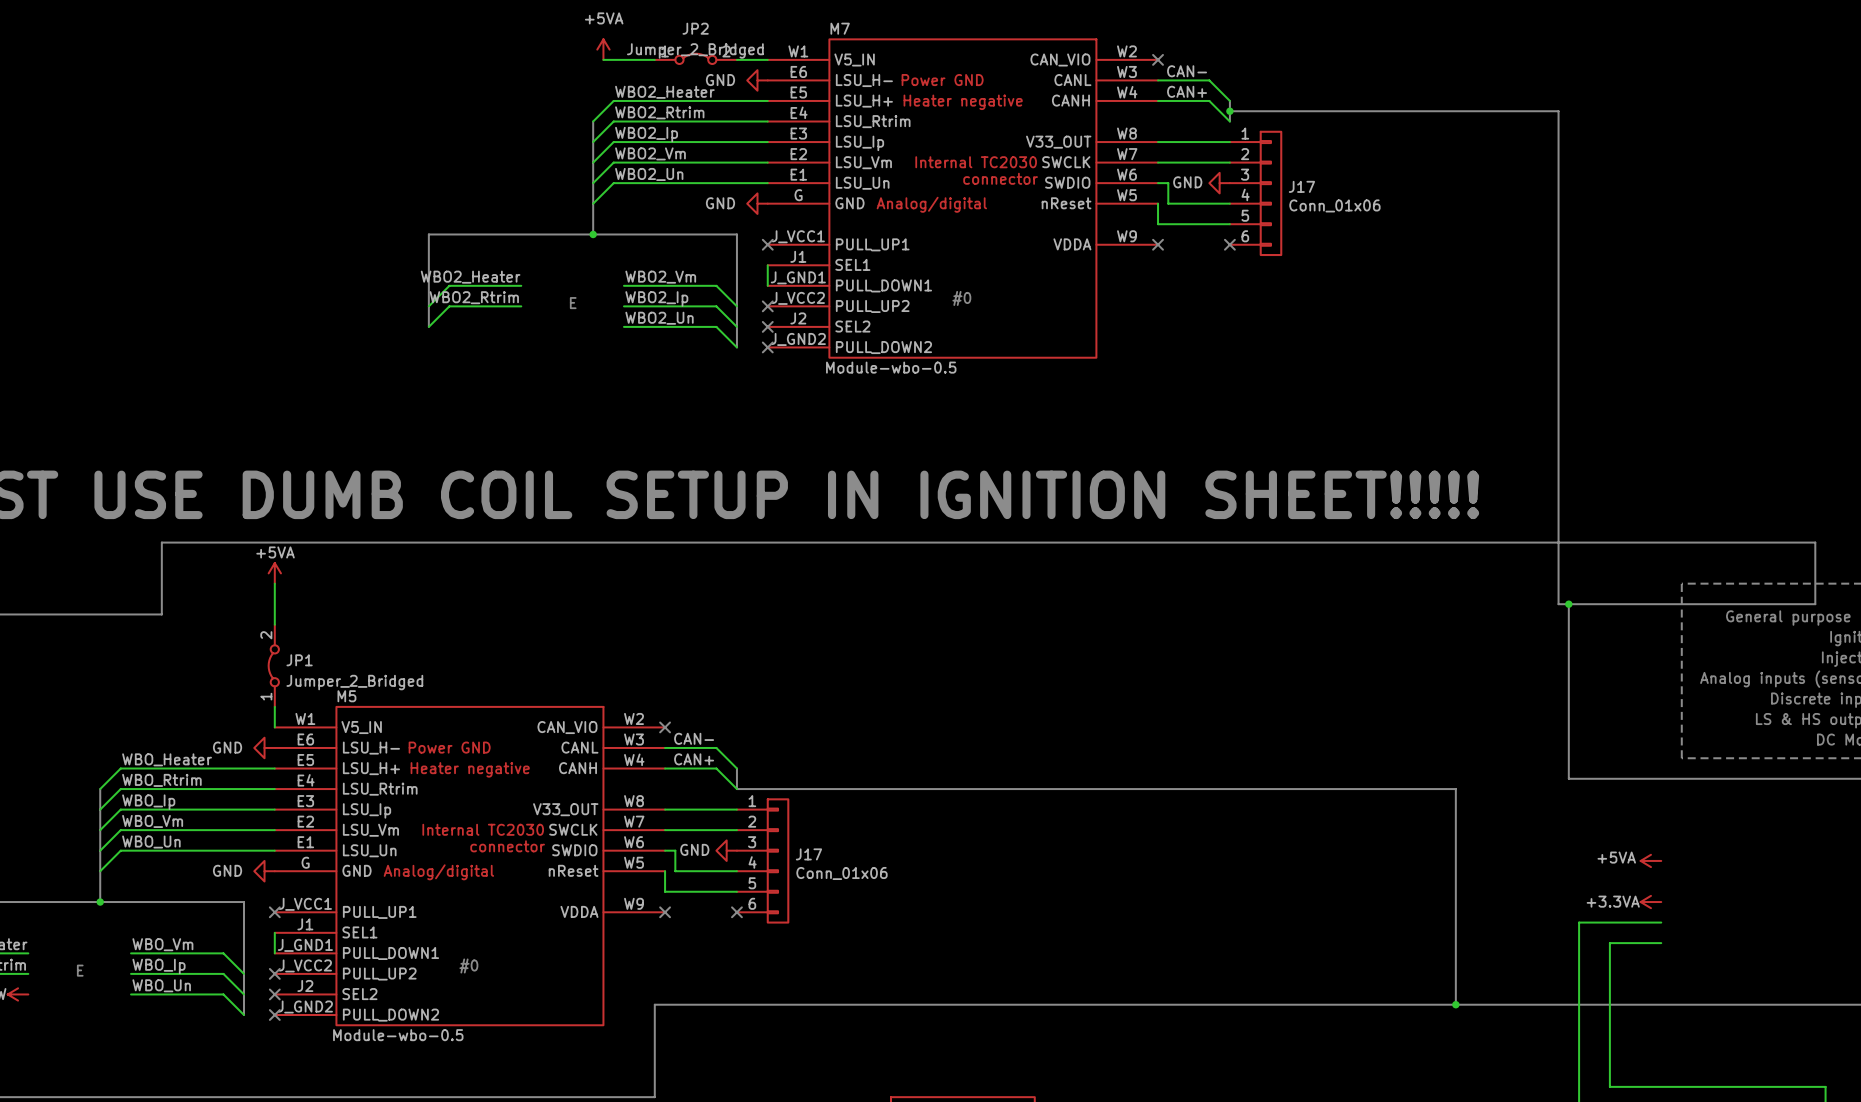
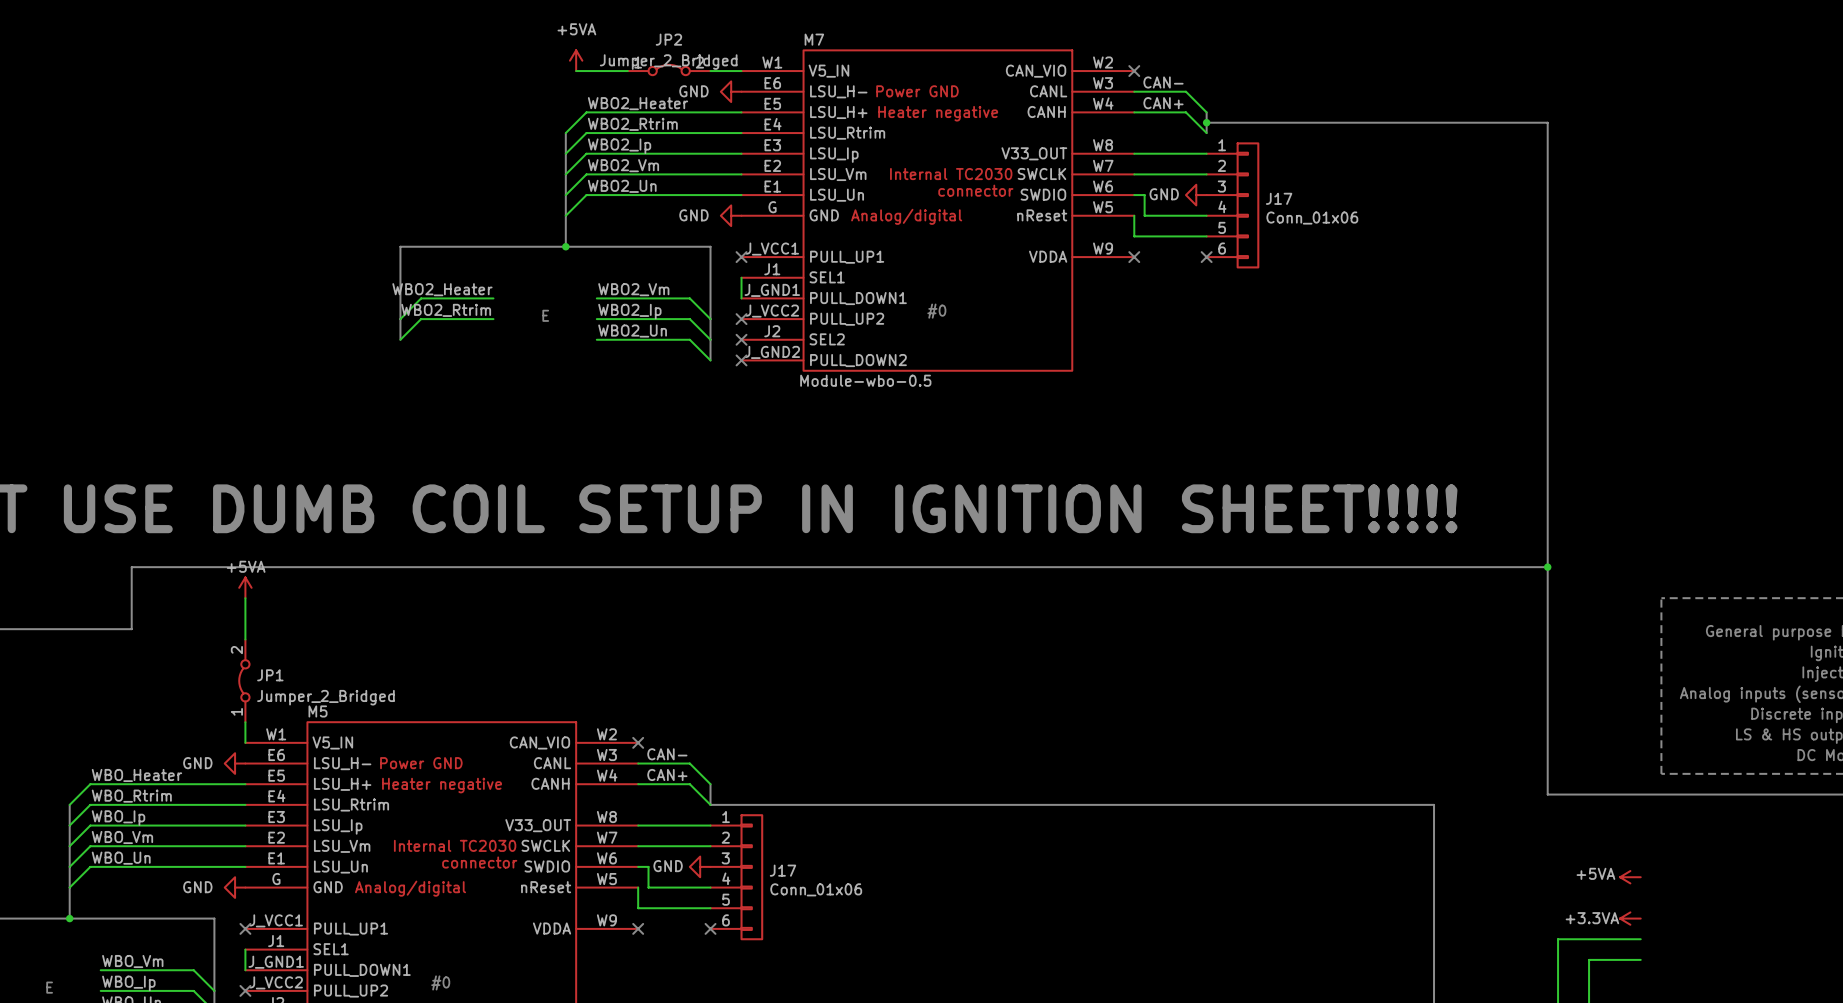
bus: (1558, 111) (1558, 604) (1815, 604) (1815, 542) (161, 542) (161, 552) -> (1547, 567) (131, 567)
bus: none -> (1537, 122) (1547, 122) (1547, 618)
junction: none -> (1547, 567)
junction: (1568, 604) -> none

